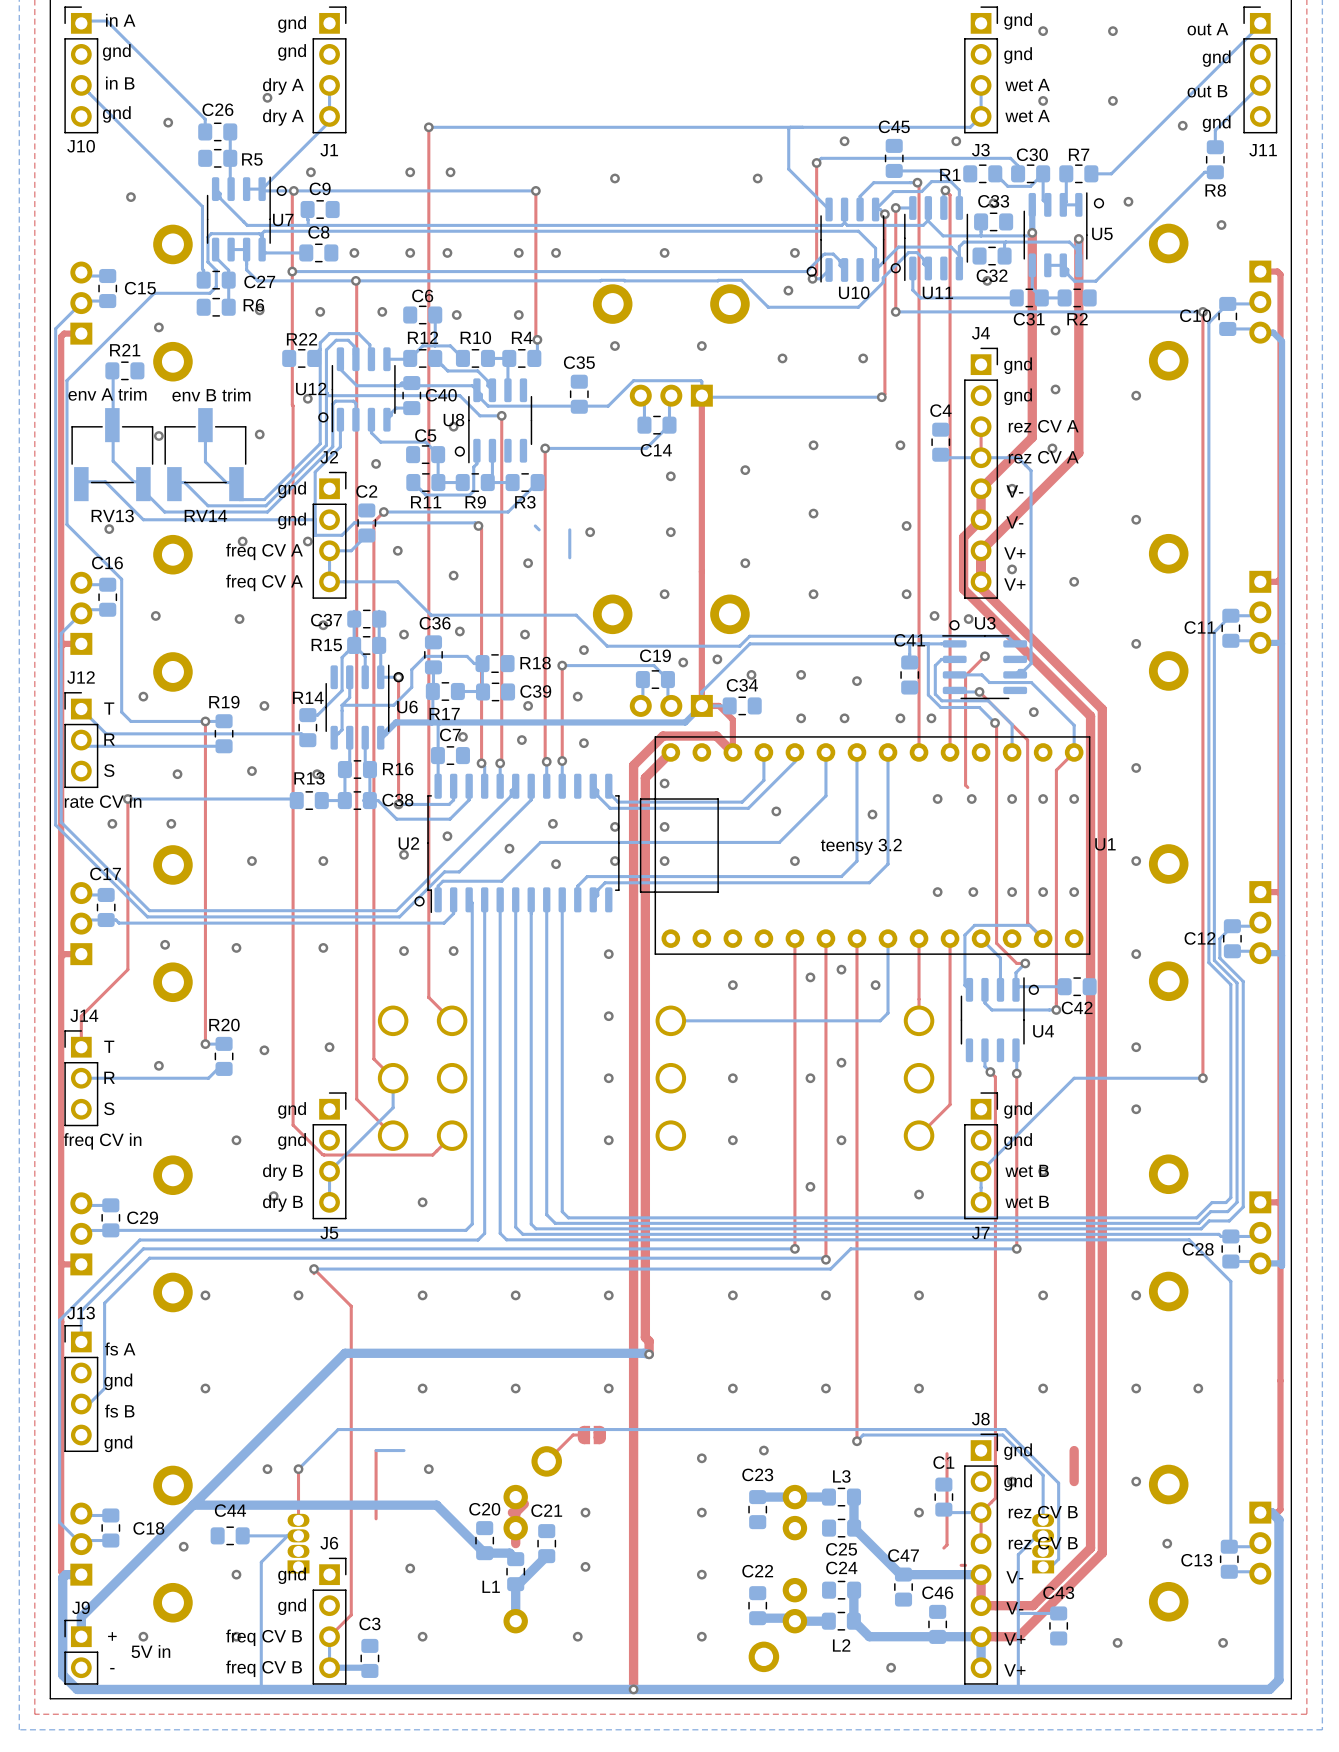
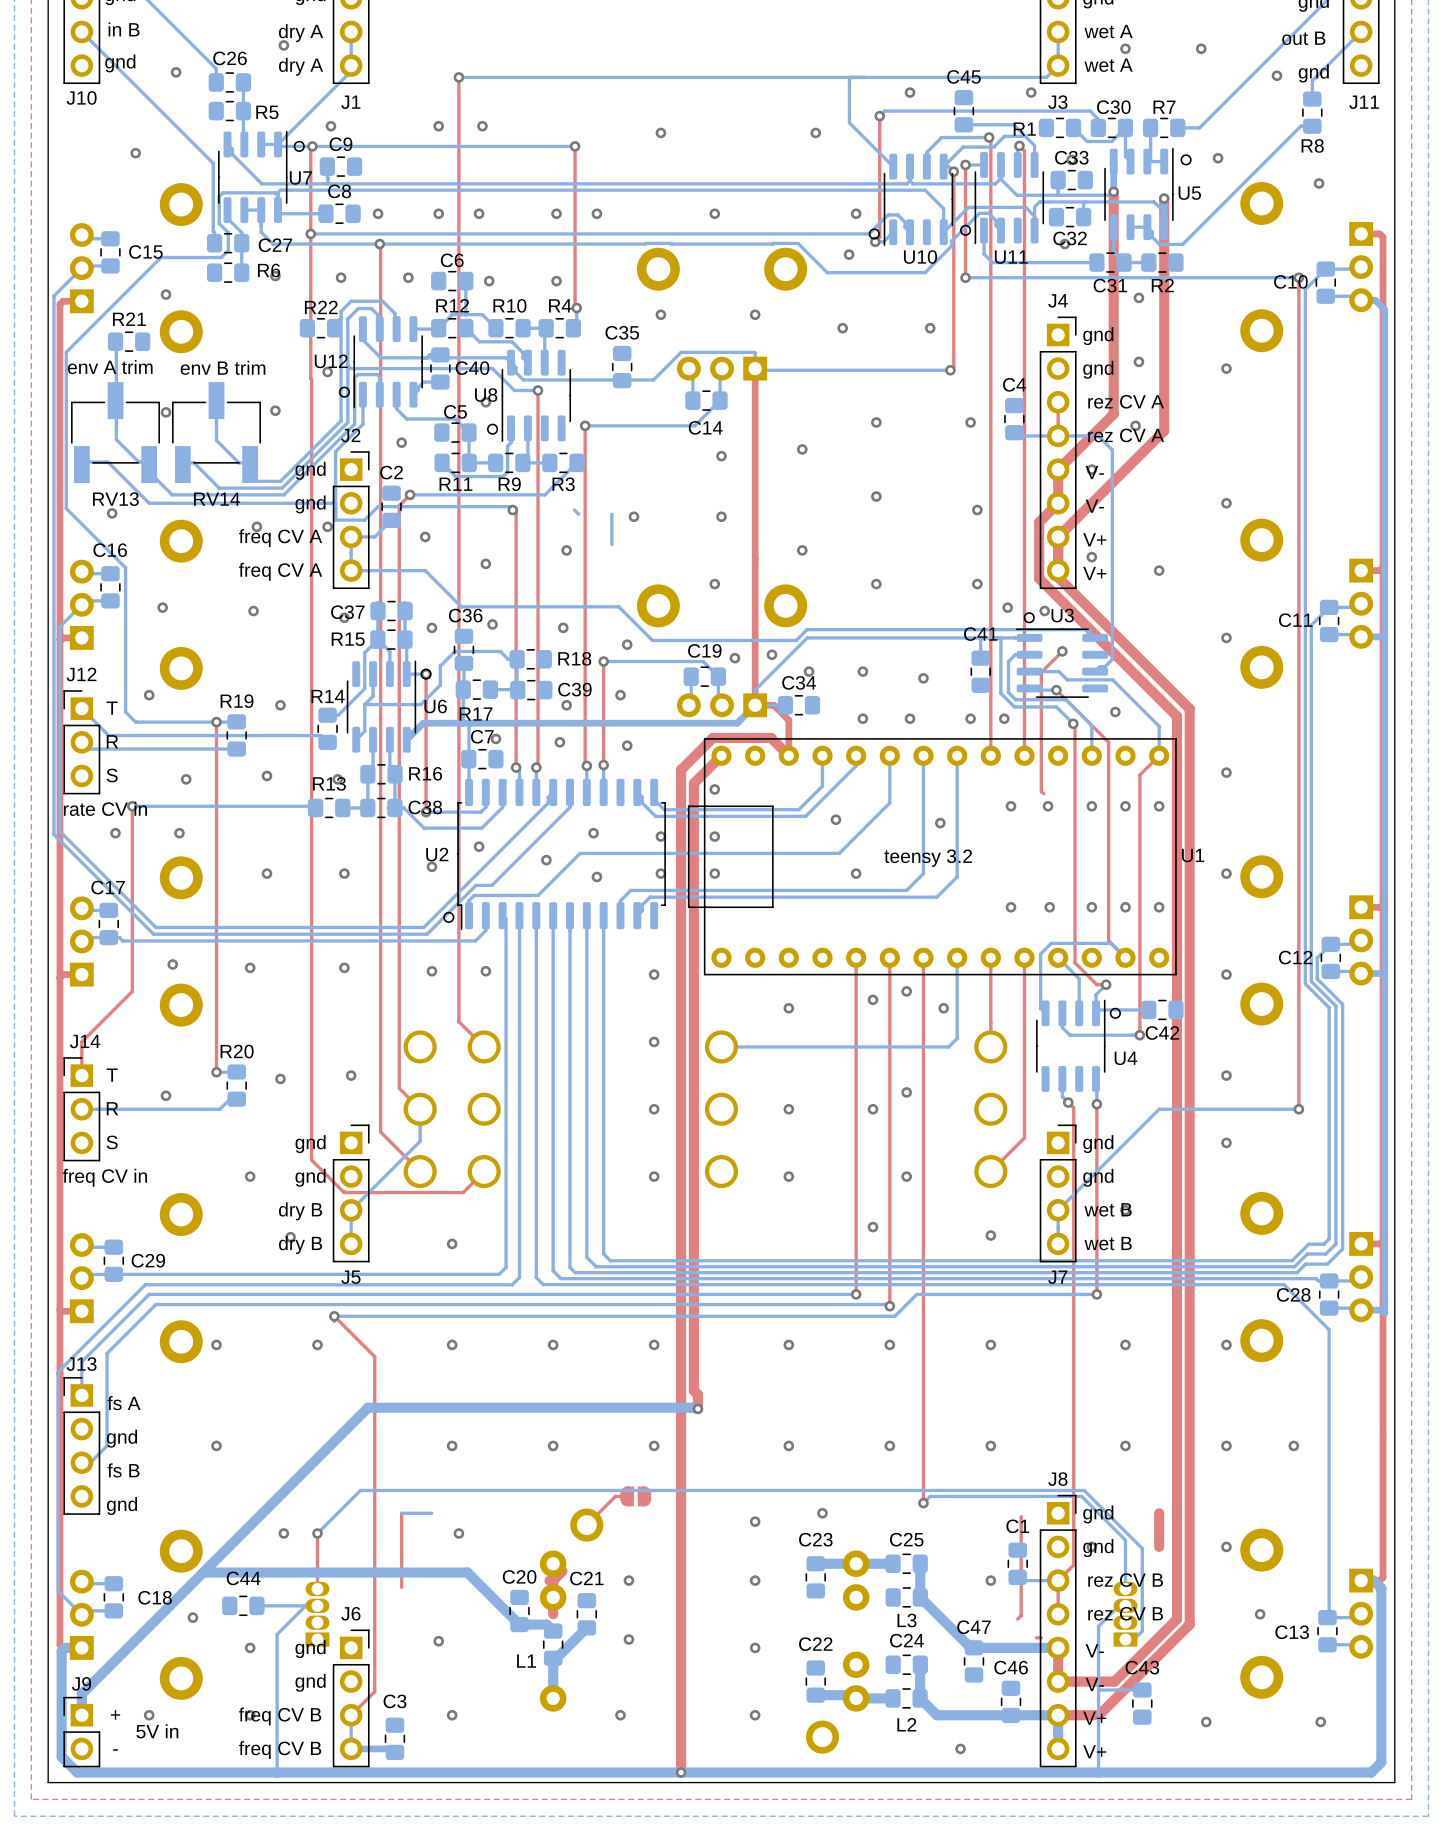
L3 name position: L3 (841, 1476) -> L3 (907, 1620)
C25 name position: C25 (841, 1549) -> C25 (906, 1539)

